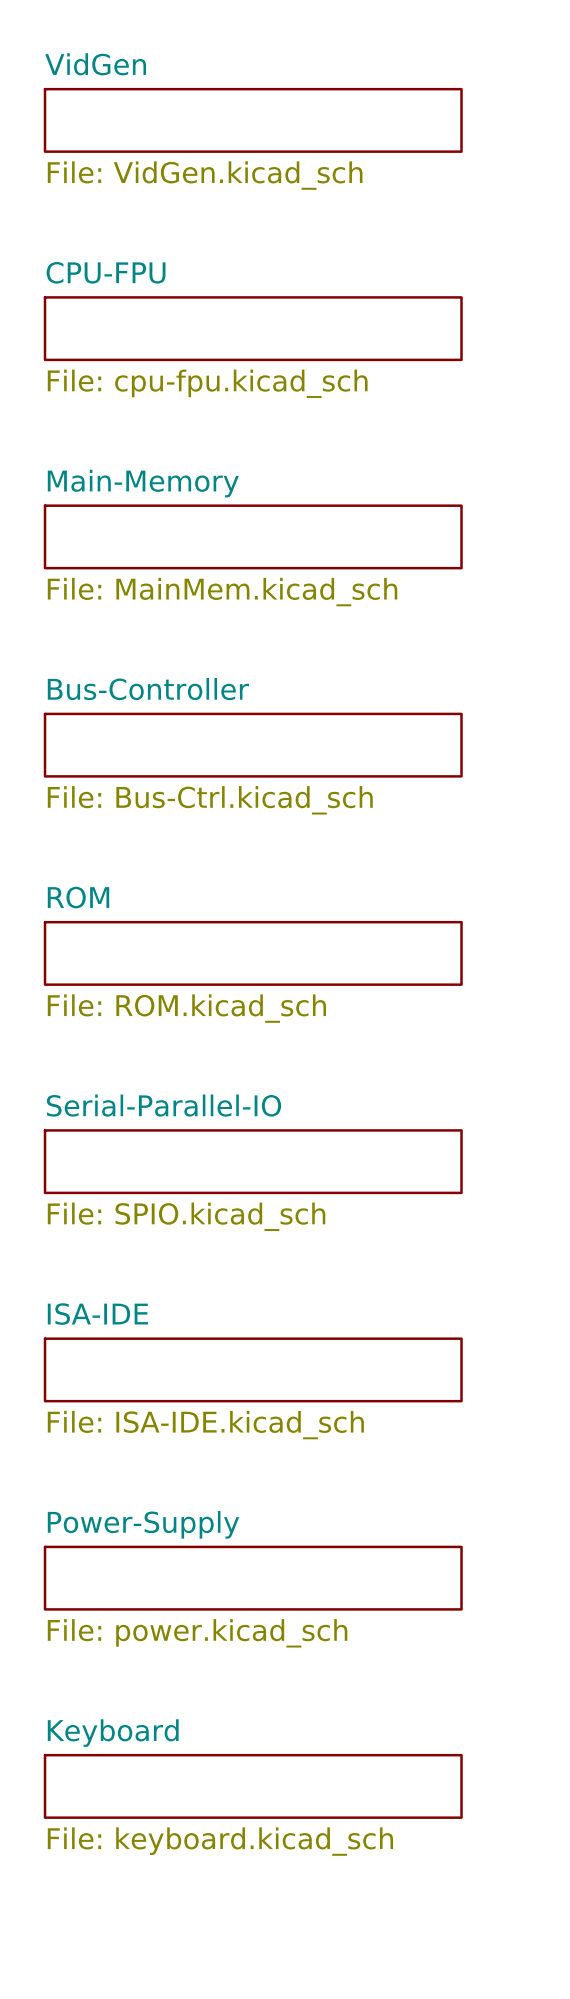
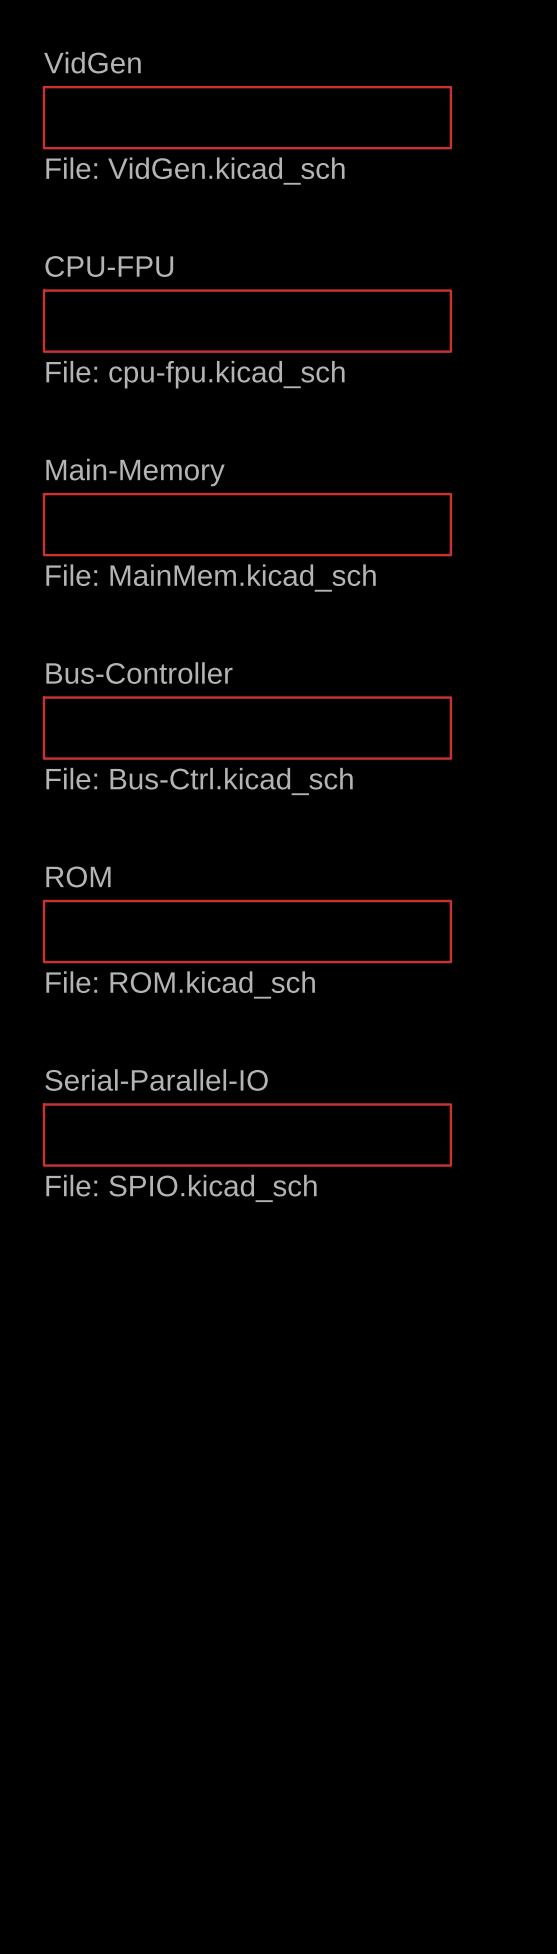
sheet ISA-IDE: File: ISA-IDE.kicad_sch (253, 1369) -> none
sheet Power-Supply: File: power.kicad_sch (253, 1578) -> none
sheet Keyboard: File: keyboard.kicad_sch (253, 1786) -> none

